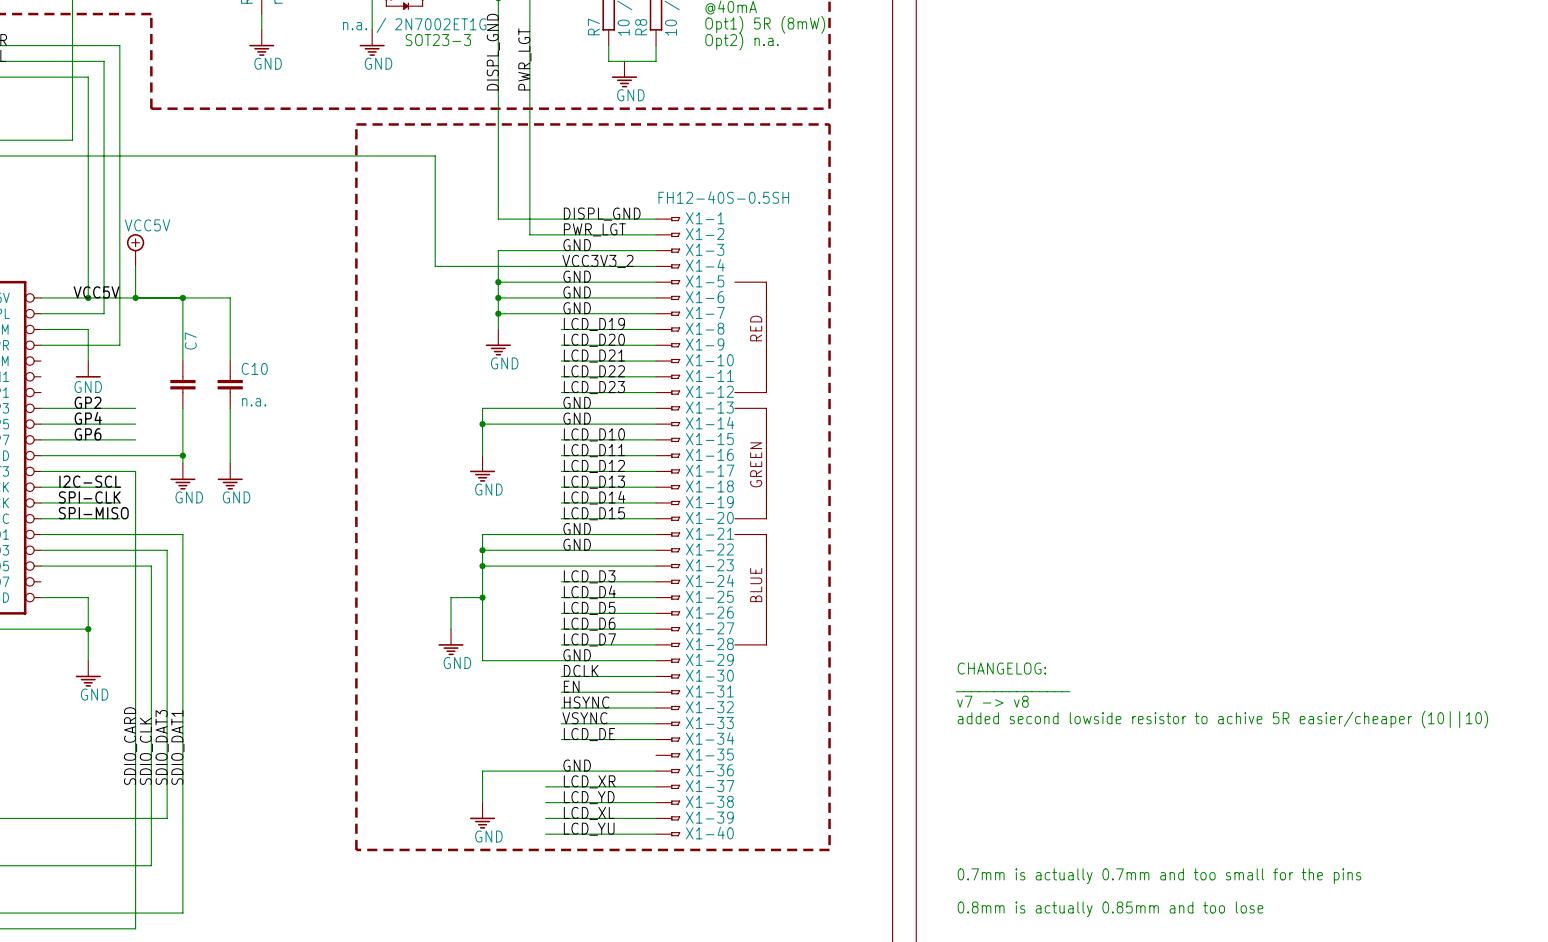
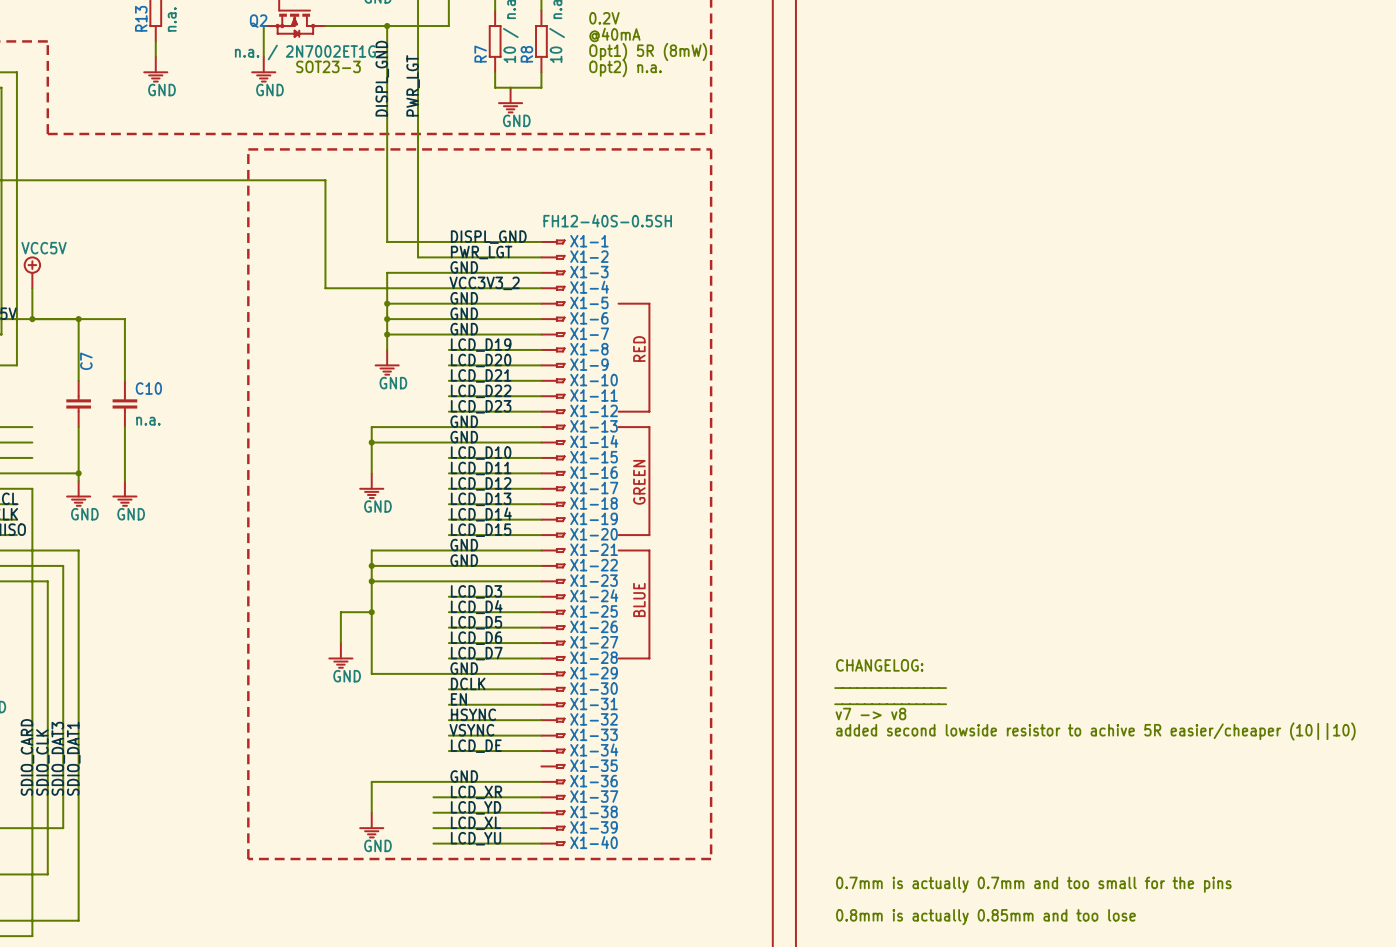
text: none -> CHANGELOG: (879, 665)
text: CHANGELOG: (1001, 668) -> _______________ (890, 688)

